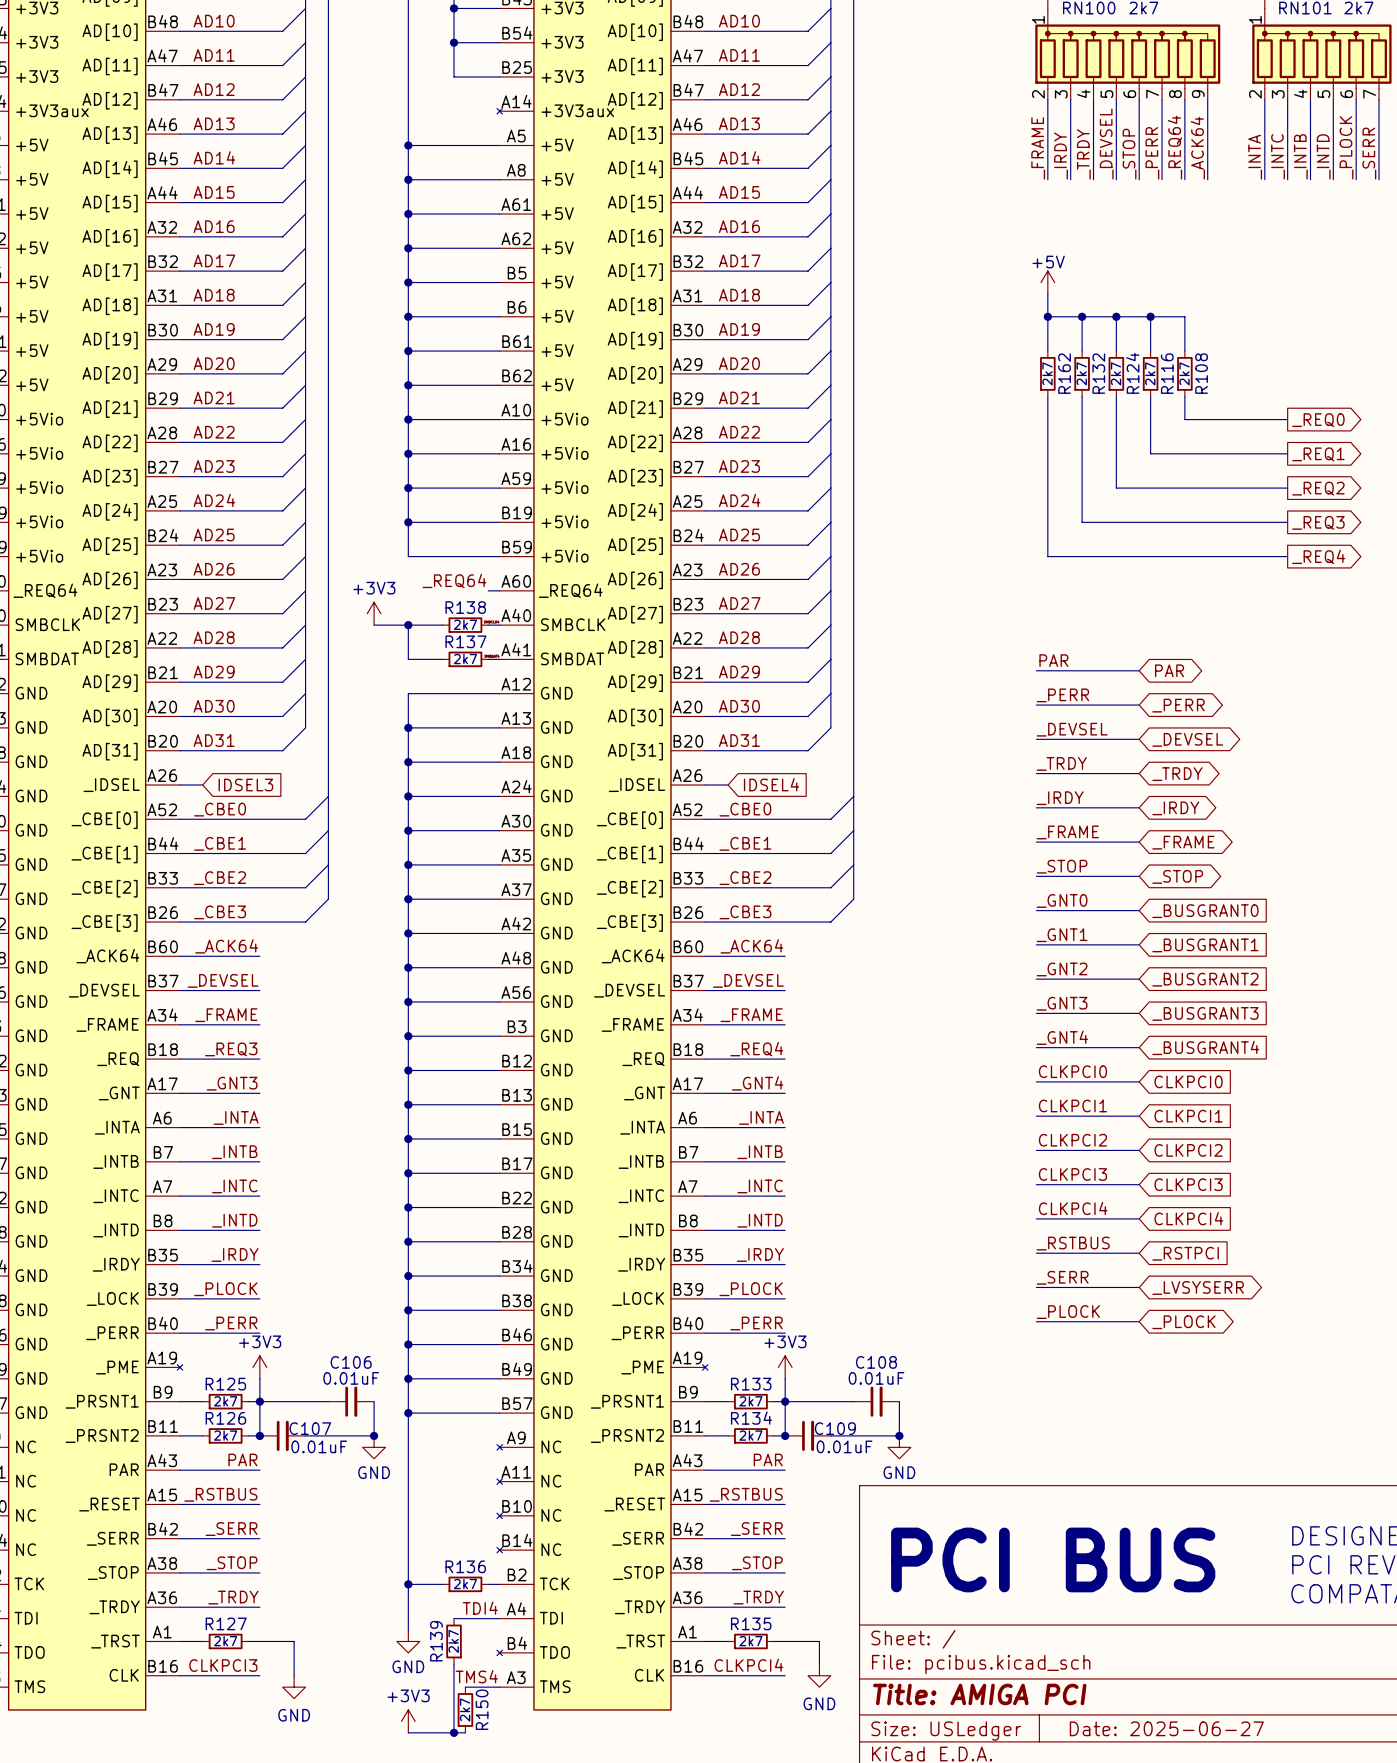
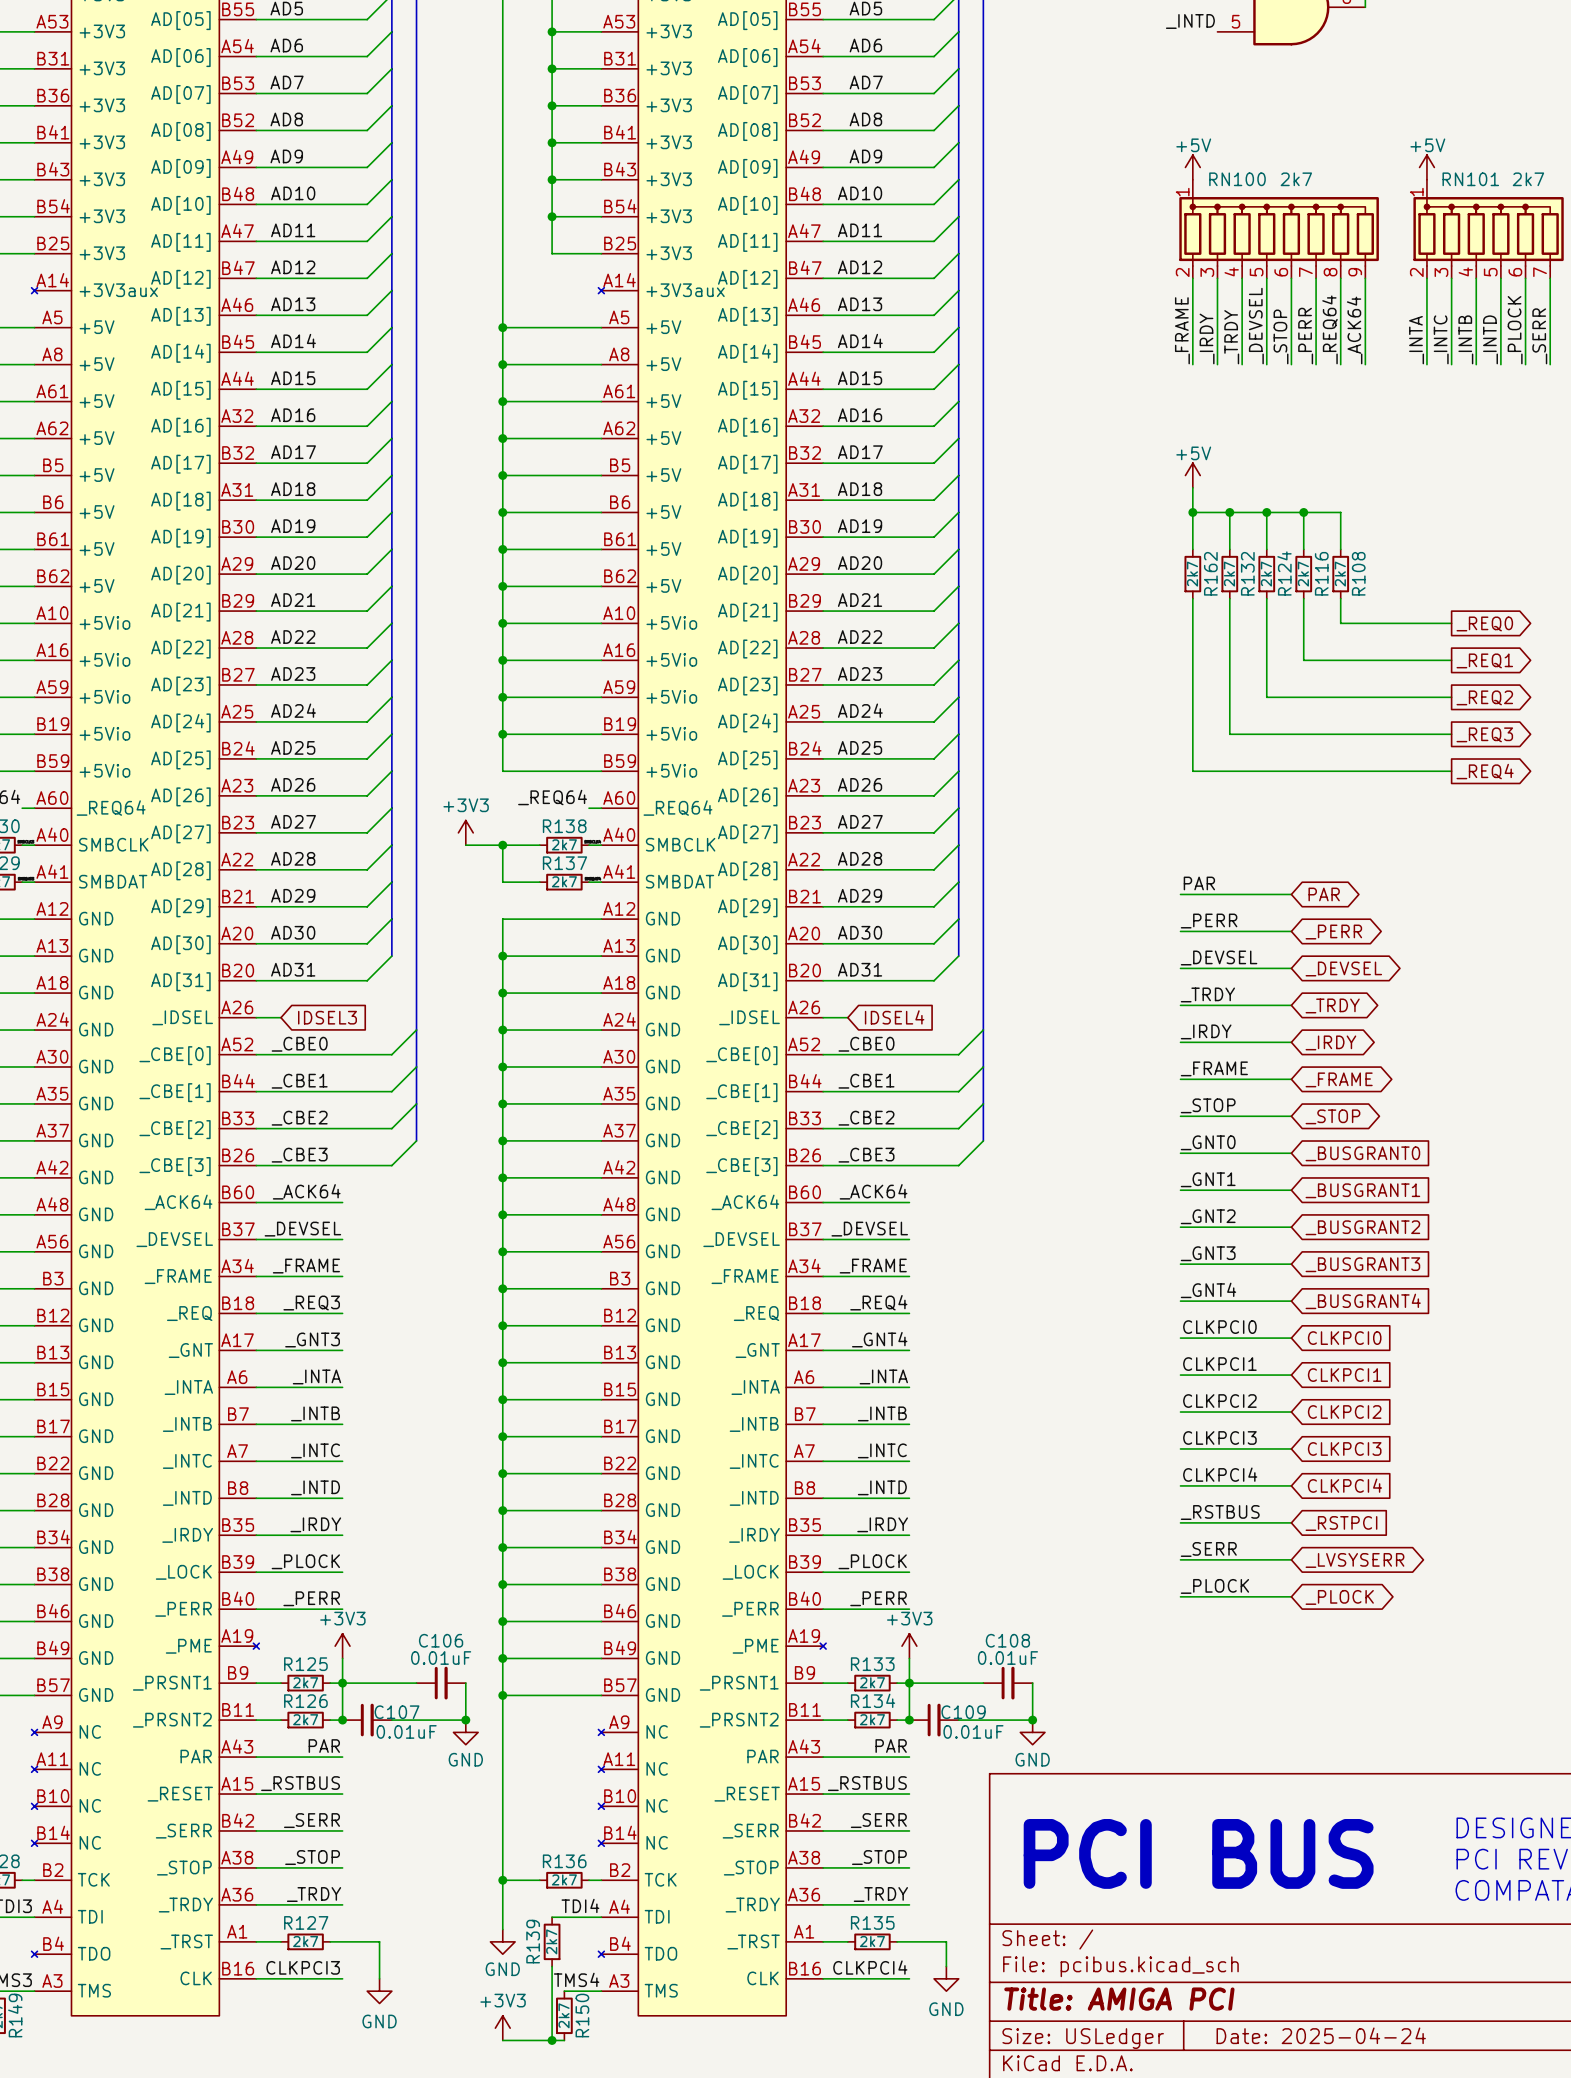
title block: Date: 2025-06-27 (1166, 1728) -> Date: 2025-04-24 (1321, 2035)

